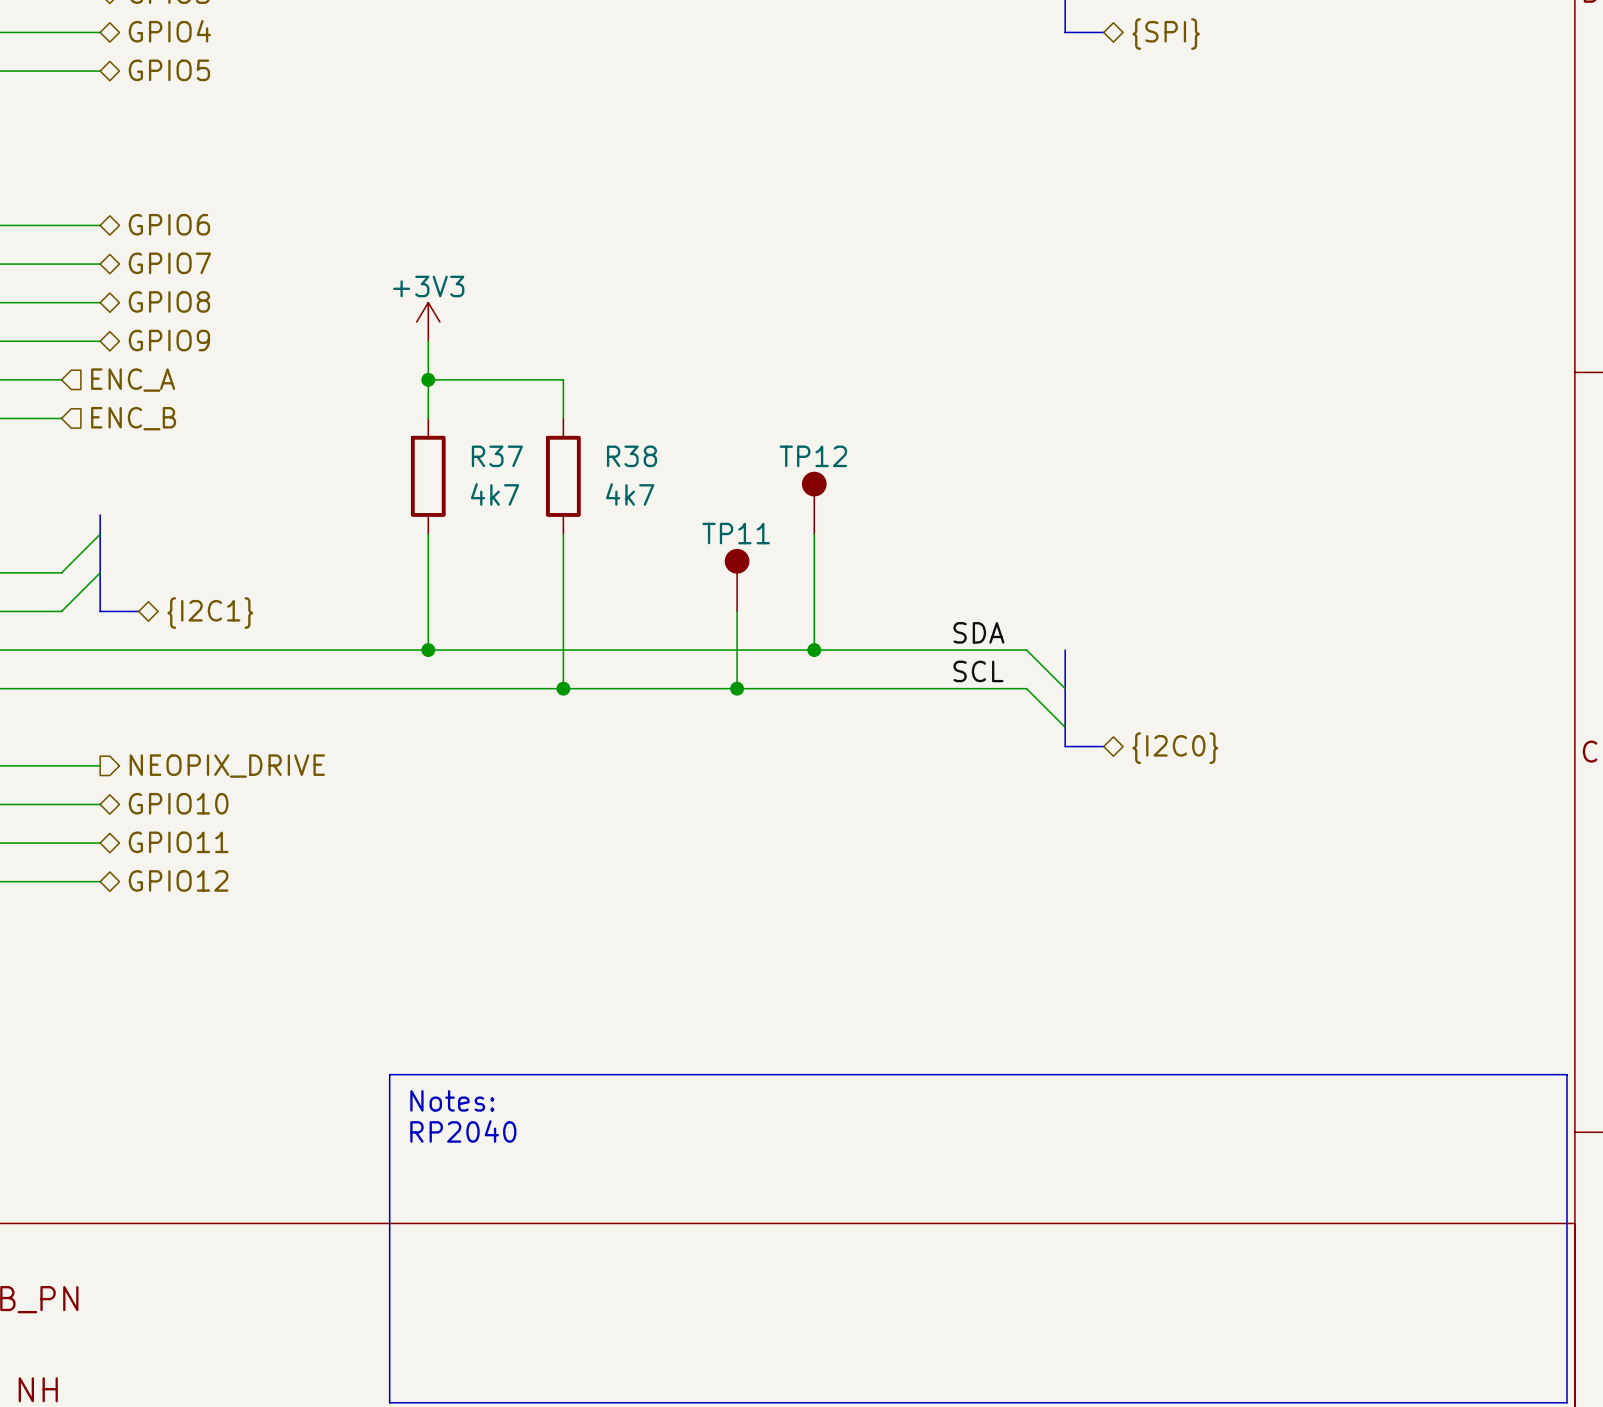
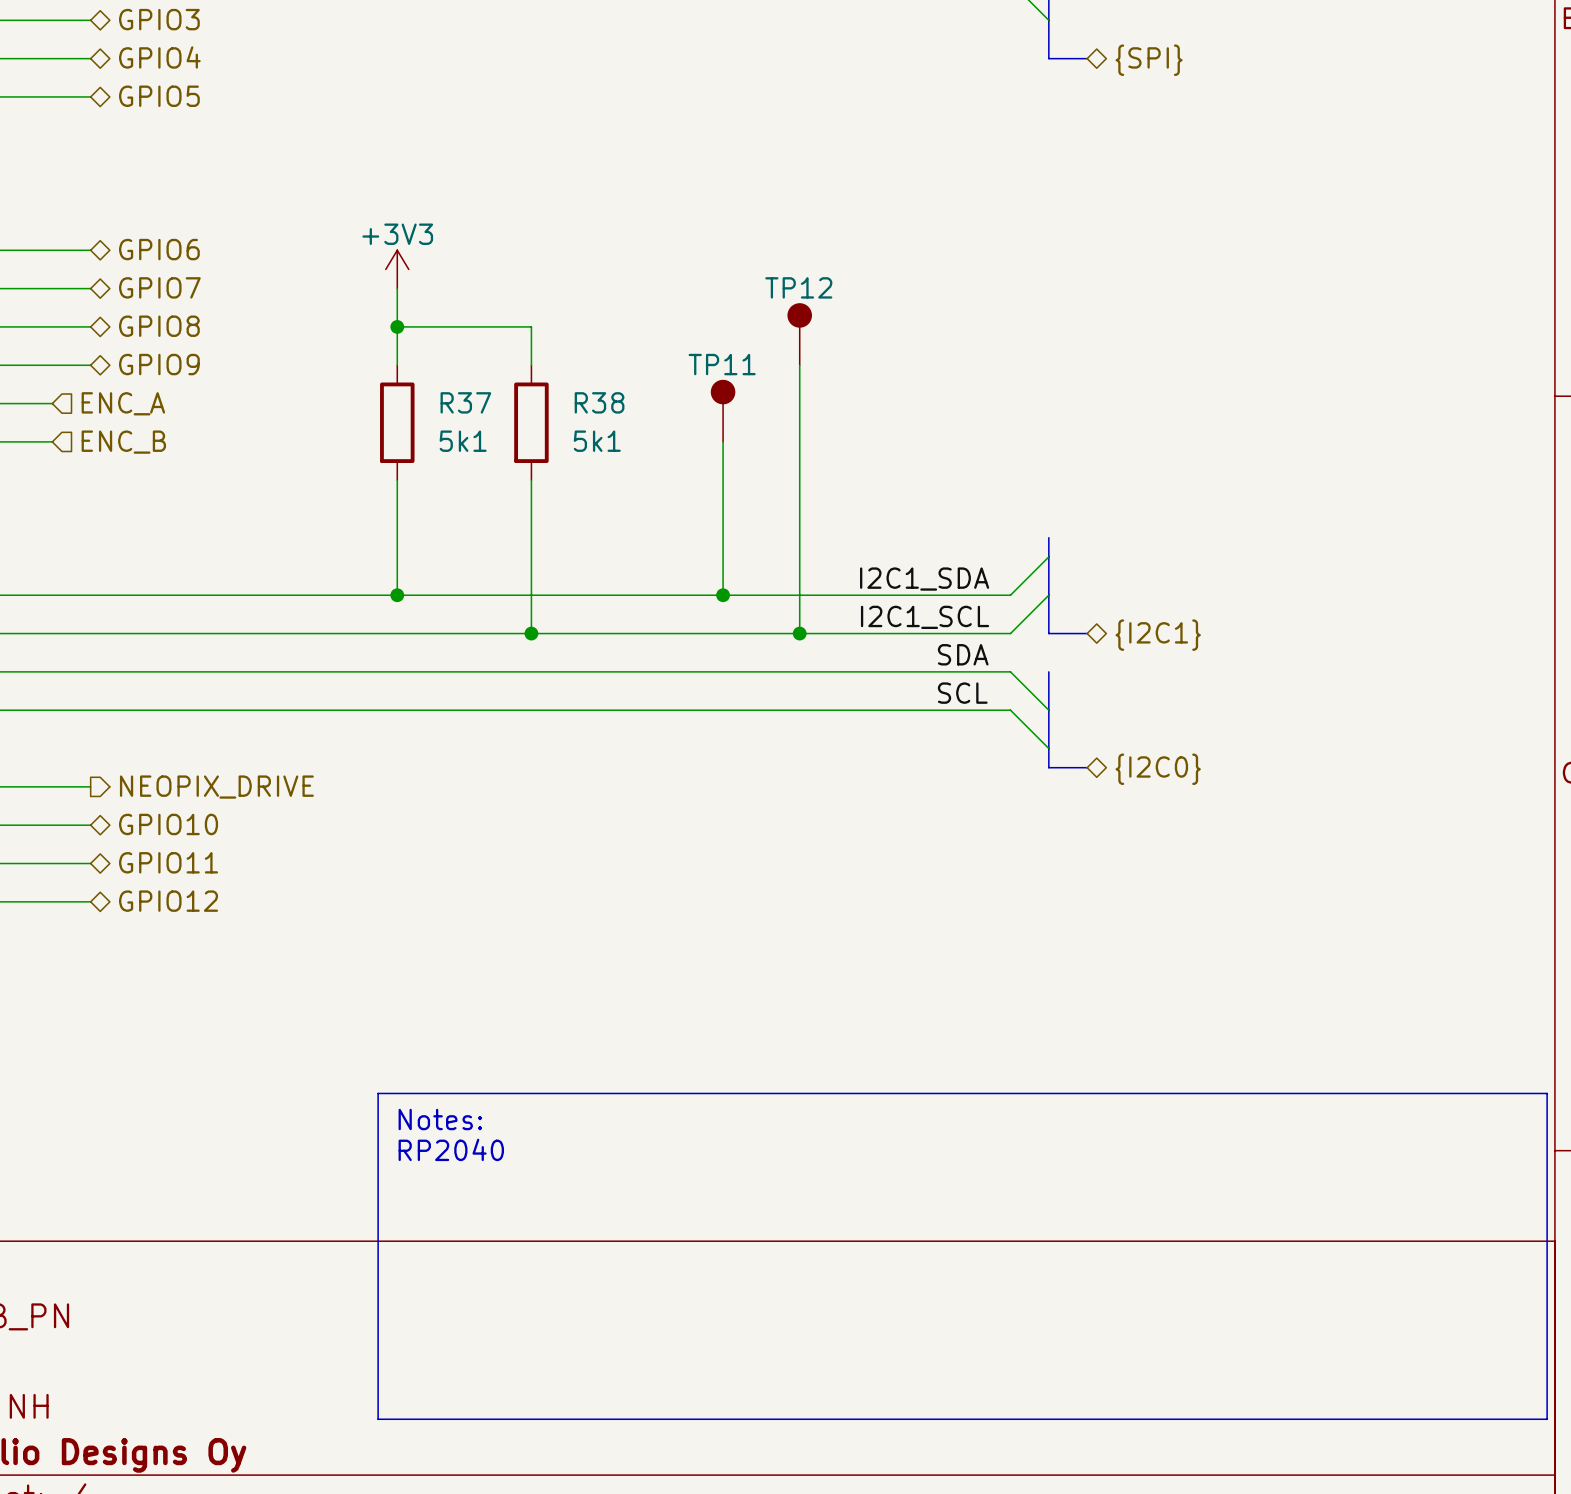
power symbol position: +3V3 (428, 321) -> +3V3 (397, 269)
wire: (428, 341) (428, 418) -> (397, 288) (397, 365)
wire: none -> (799, 365) (799, 556)
wire: (428, 379) (563, 379) (563, 418) -> (397, 326) (531, 326) (531, 365)
junction position: (428, 379) -> (397, 326)
wire: none -> (723, 441) (723, 595)
R37 position: (428, 476) -> (397, 422)
R38 position: (563, 476) -> (531, 422)
R37 text: 4k7 (495, 494) -> 5k1 (463, 441)
R38 text: 4k7 (630, 494) -> 5k1 (597, 441)
TP12 position: (814, 503) -> (799, 334)
bus: (100, 514) (100, 611) (138, 611) -> none
bus: none -> (1048, 537) (1048, 633) (1087, 633)
wire: (100, 534) (61, 572) -> (1048, 556) (1010, 595) (52, 595)
wire: (428, 534) (428, 650) -> (397, 480) (397, 595)
wire: (563, 534) (563, 688) -> (531, 480) (531, 633)
label: none -> I2C1_SDA (924, 579)
wire: (100, 572) (61, 611) -> (1048, 595) (1010, 633) (52, 633)
junction: none -> (397, 595)
junction: none -> (723, 595)
TP11 position: (737, 580) -> (723, 411)
label: none -> I2C1_SCL (925, 617)
junction: none -> (531, 633)
wire: (737, 611) (737, 688) -> none
wire: (814, 611) (814, 650) -> none
hierarchical label: {I2C1} (210, 613) -> none
hierarchical label: none -> {I2C1} (1158, 635)
junction: (428, 650) -> none
junction position: (814, 650) -> (799, 633)
junction: (563, 688) -> none
junction: (737, 688) -> none

